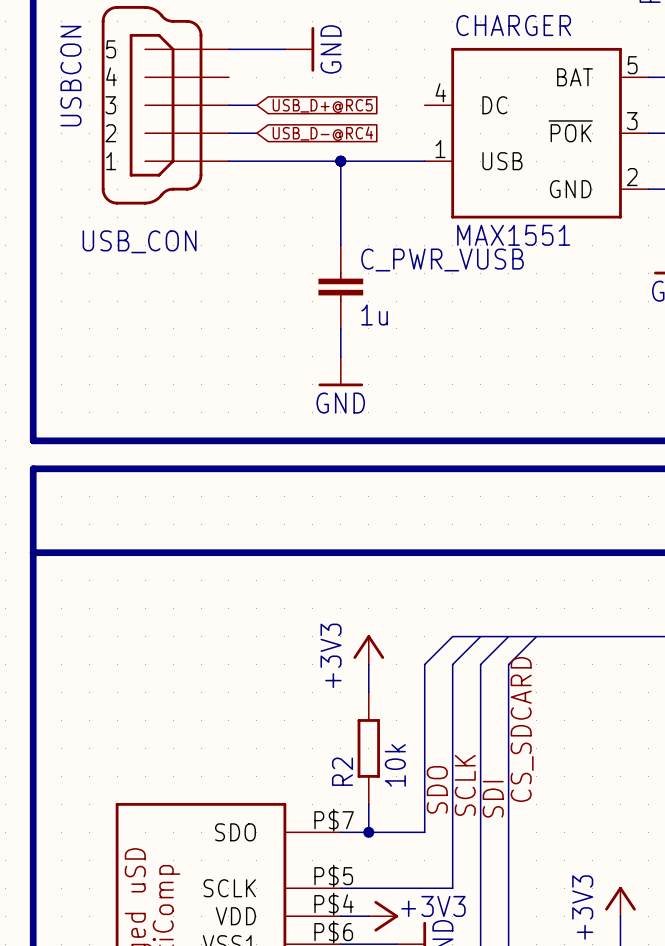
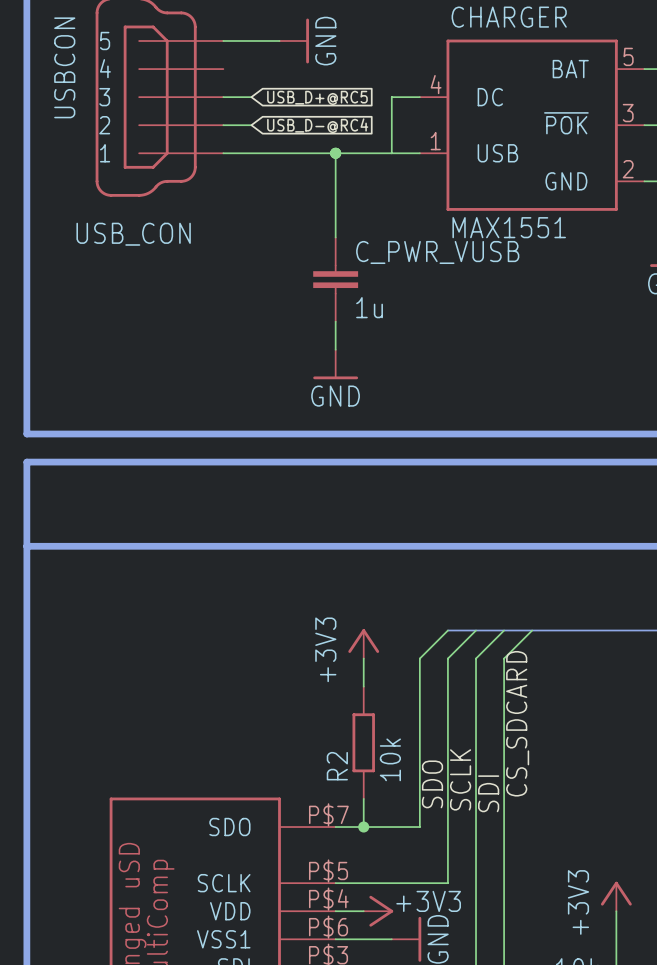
wire: none -> (419, 97) (391, 97) (391, 153)

